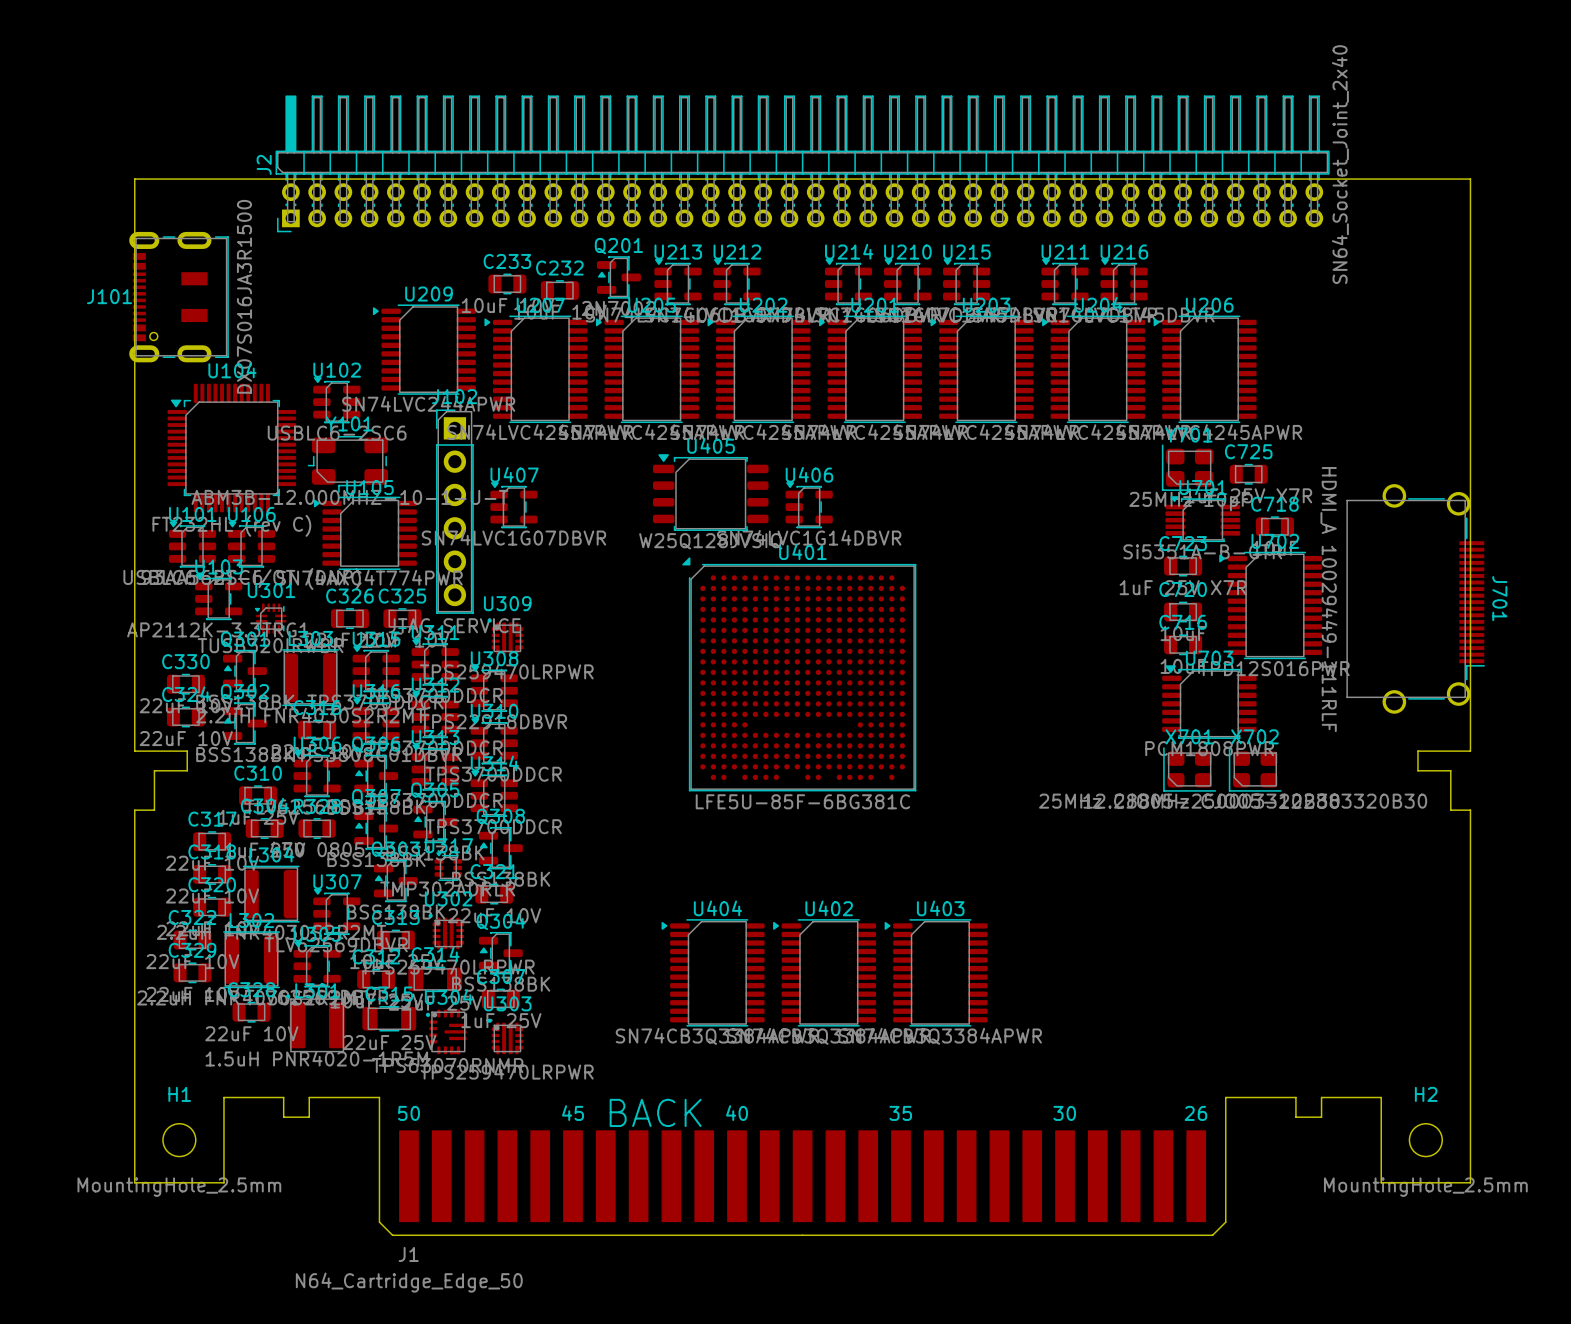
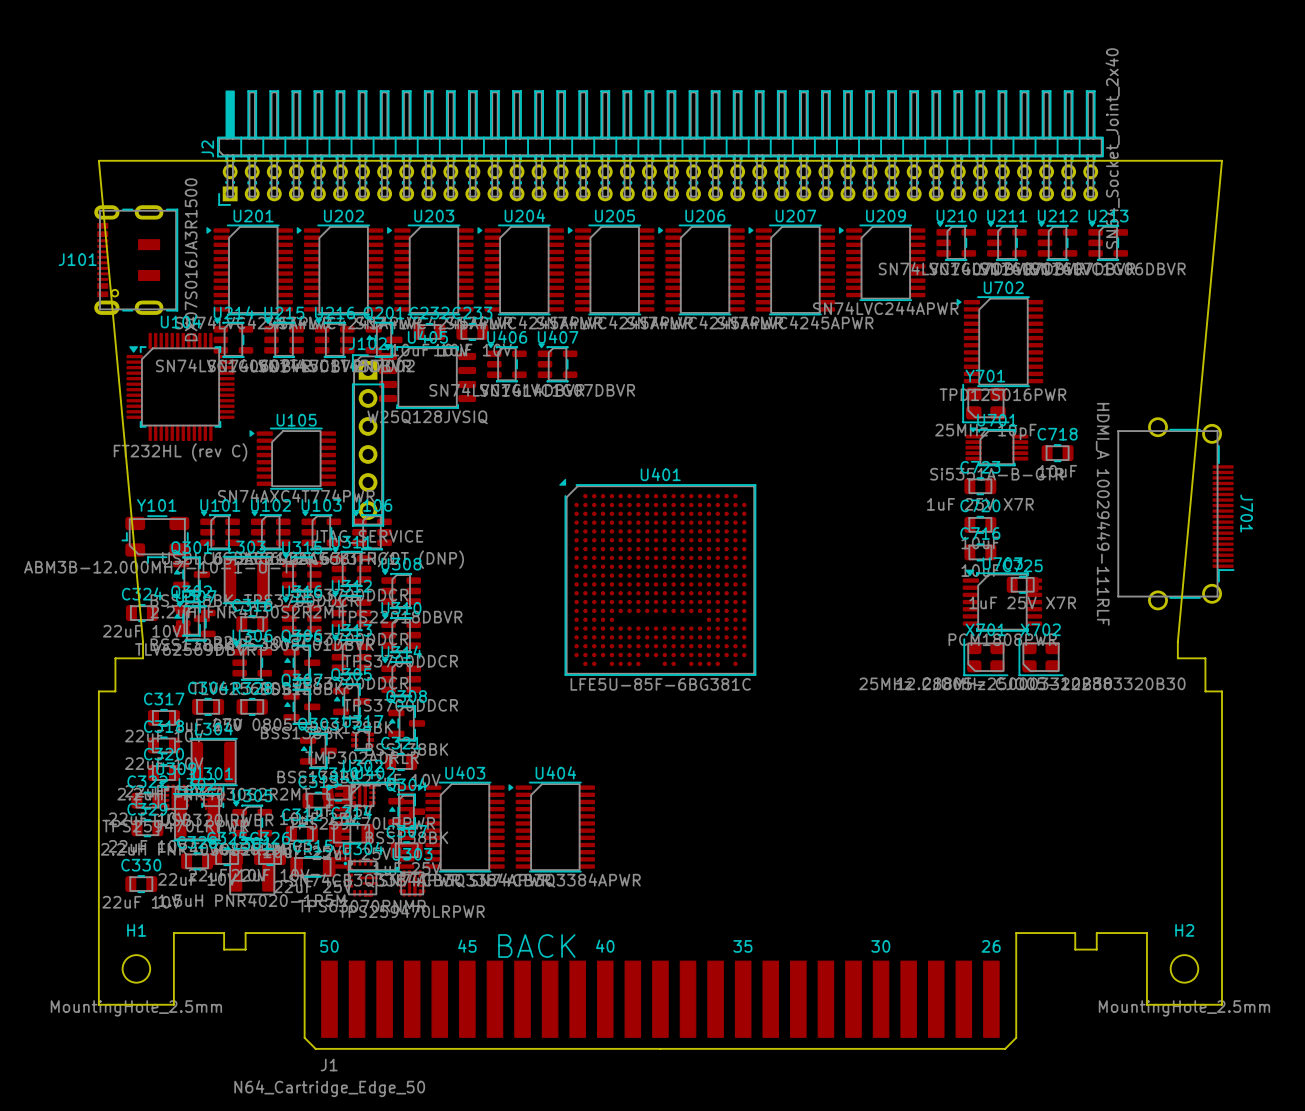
board edge: (134, 179) (134, 751) (187, 751) -> (98, 160) (143, 641)
board edge: (1470, 179) (1470, 751) (1417, 751) -> (1221, 160) (1177, 641)
Q201 position: (618, 277) -> (384, 339)
U213 position: (677, 282) -> (1108, 241)
U212 position: (737, 282) -> (1057, 241)
U214 position: (848, 282) -> (233, 338)
U210 position: (907, 282) -> (956, 241)
U215 position: (966, 282) -> (284, 338)
U211 position: (1065, 282) -> (1006, 241)
U216 position: (1124, 282) -> (334, 338)
C233 position: (507, 284) -> (472, 331)
C232 position: (559, 290) -> (429, 331)
U209 position: (424, 349) -> (882, 262)
U207 position: (535, 369) -> (791, 269)
U205 position: (647, 369) -> (611, 269)
U202 position: (758, 369) -> (340, 269)
U201 position: (870, 369) -> (249, 269)
U203 position: (982, 369) -> (430, 269)
U204 position: (1093, 369) -> (520, 269)
U206 position: (1205, 369) -> (701, 269)
U102 position: (336, 400) -> (270, 530)
Y101 position: (347, 464) -> (155, 539)
C725 position: (1248, 474) -> (1022, 584)
U405 position: (710, 492) -> (427, 376)
U407 position: (513, 505) -> (557, 362)
U406 position: (809, 505) -> (506, 362)
U101 position: (192, 544) -> (220, 530)
U106 position: (251, 544) -> (371, 530)
U103 position: (218, 597) -> (321, 530)
U702 position: (1270, 605) -> (999, 341)
U301 position: (270, 618) -> (212, 797)
C326 position: (349, 618) -> (270, 857)
C325 position: (402, 618) -> (227, 857)
U309 position: (505, 636) -> (174, 796)
C330 position: (185, 684) -> (141, 884)
C310 position: (258, 795) -> (338, 792)
U307 position: (336, 911) -> (195, 621)
U404 position: (713, 972) -> (551, 827)
U402 position: (824, 972) -> (371, 827)
U403 position: (936, 972) -> (461, 827)

